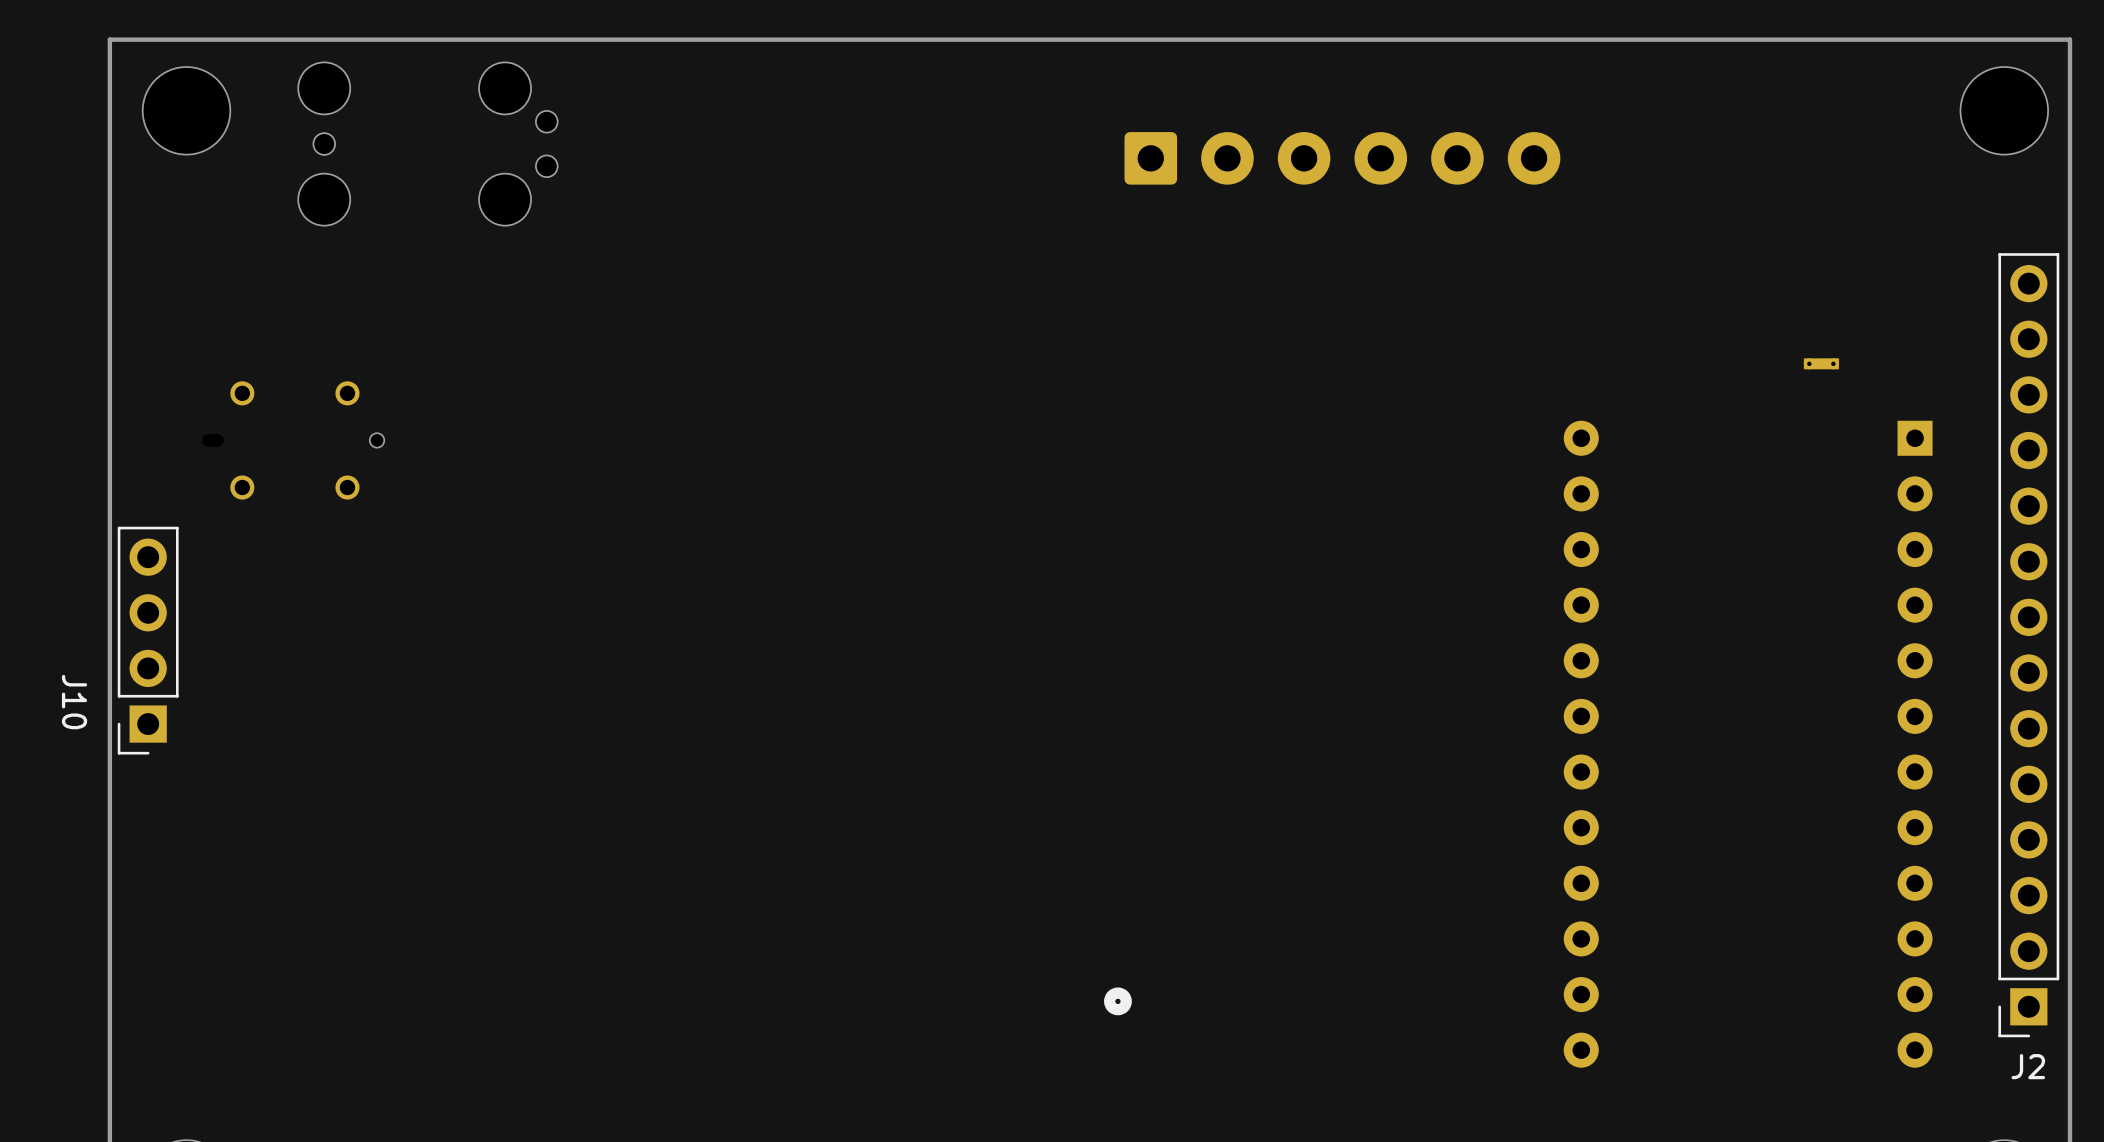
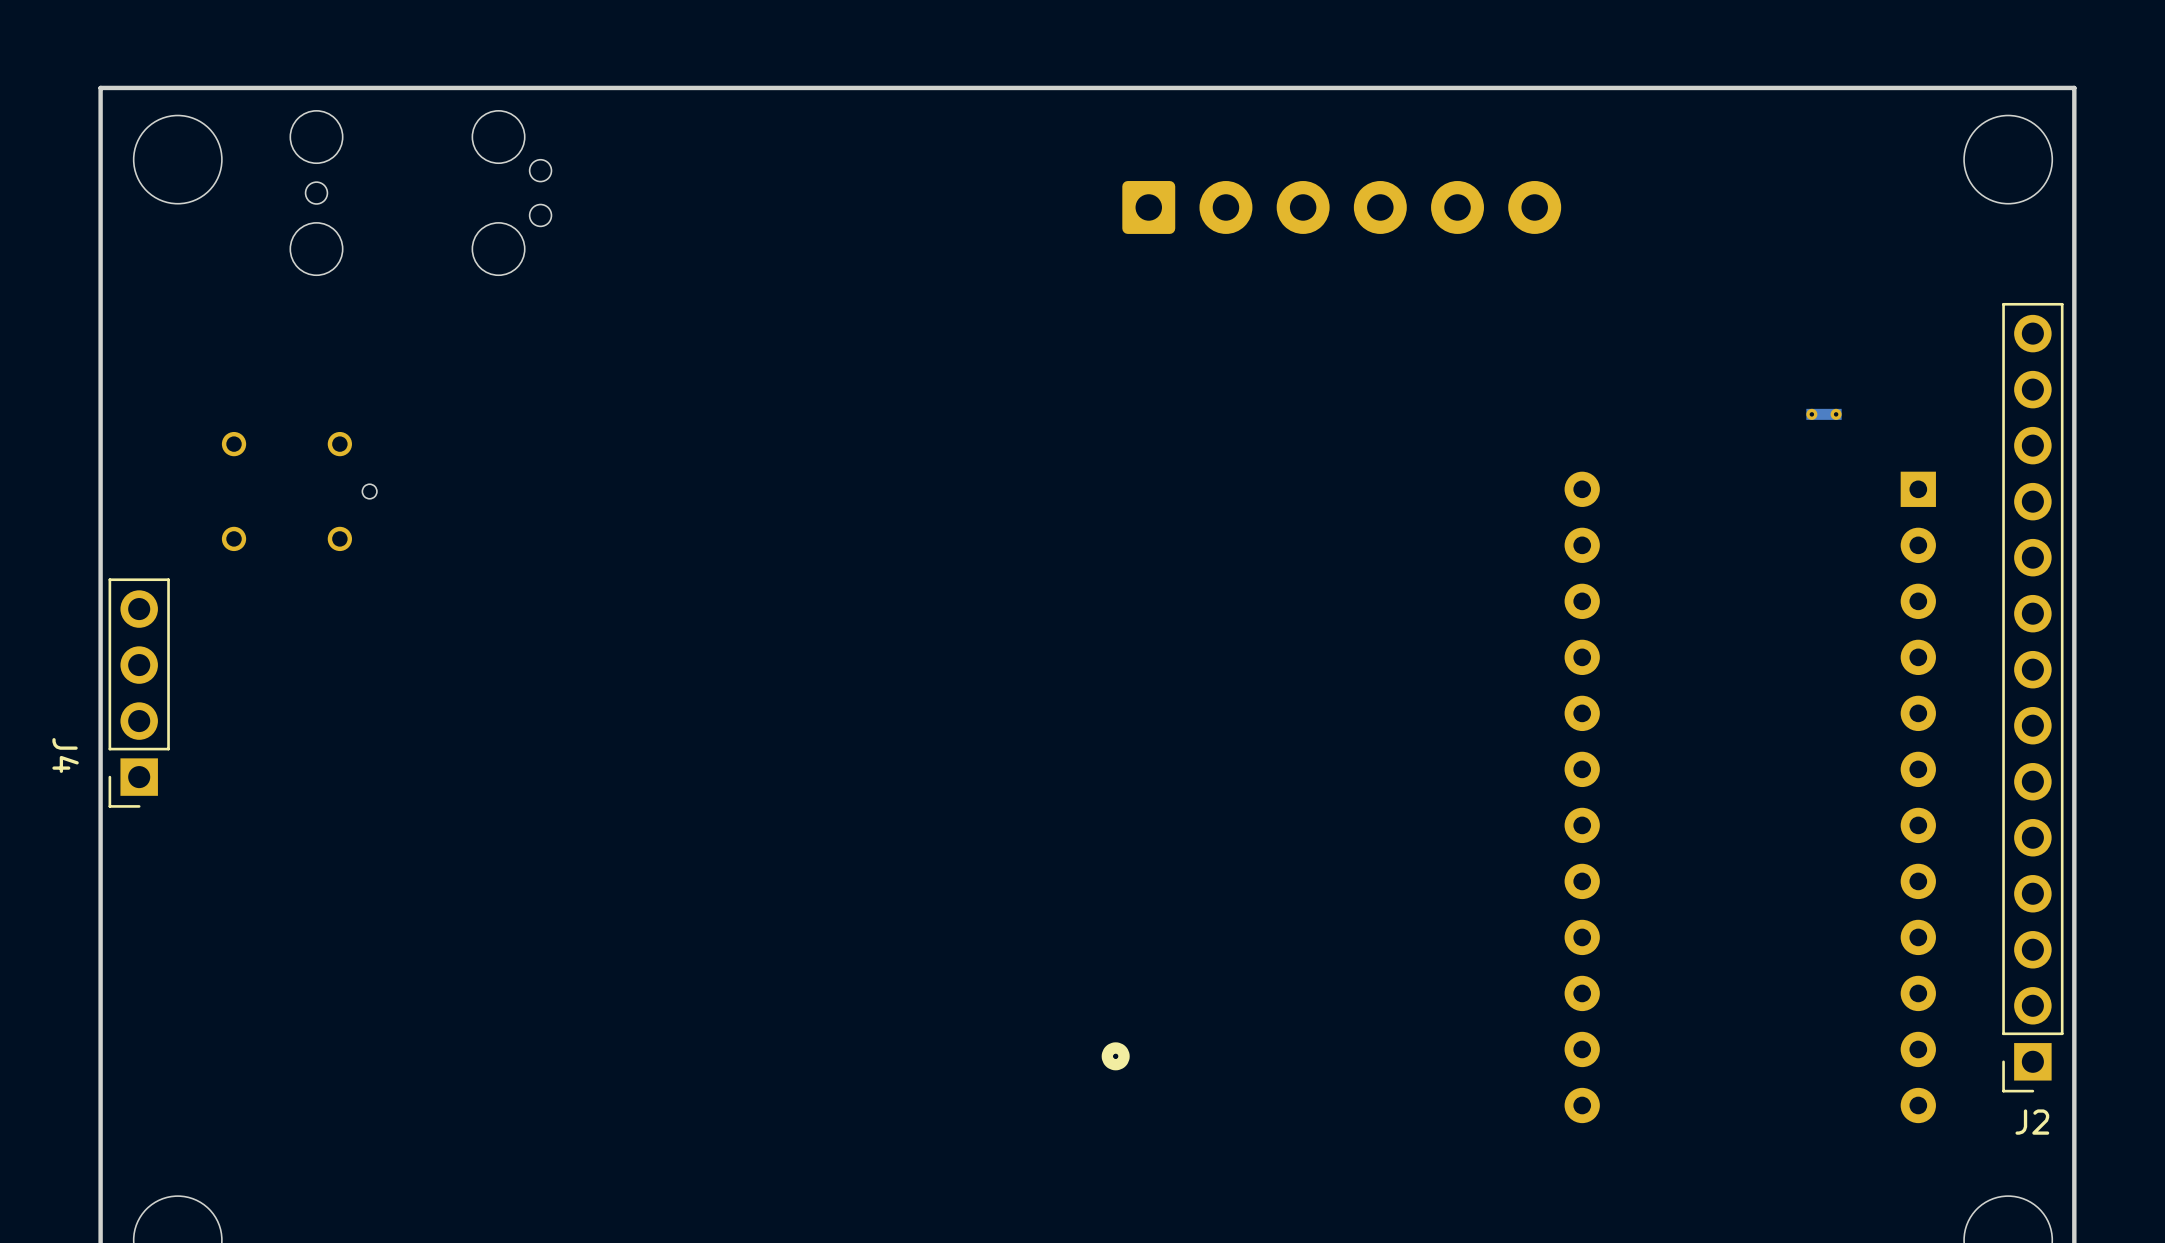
J10 name: J10 (74, 702) -> J4 (65, 755)

